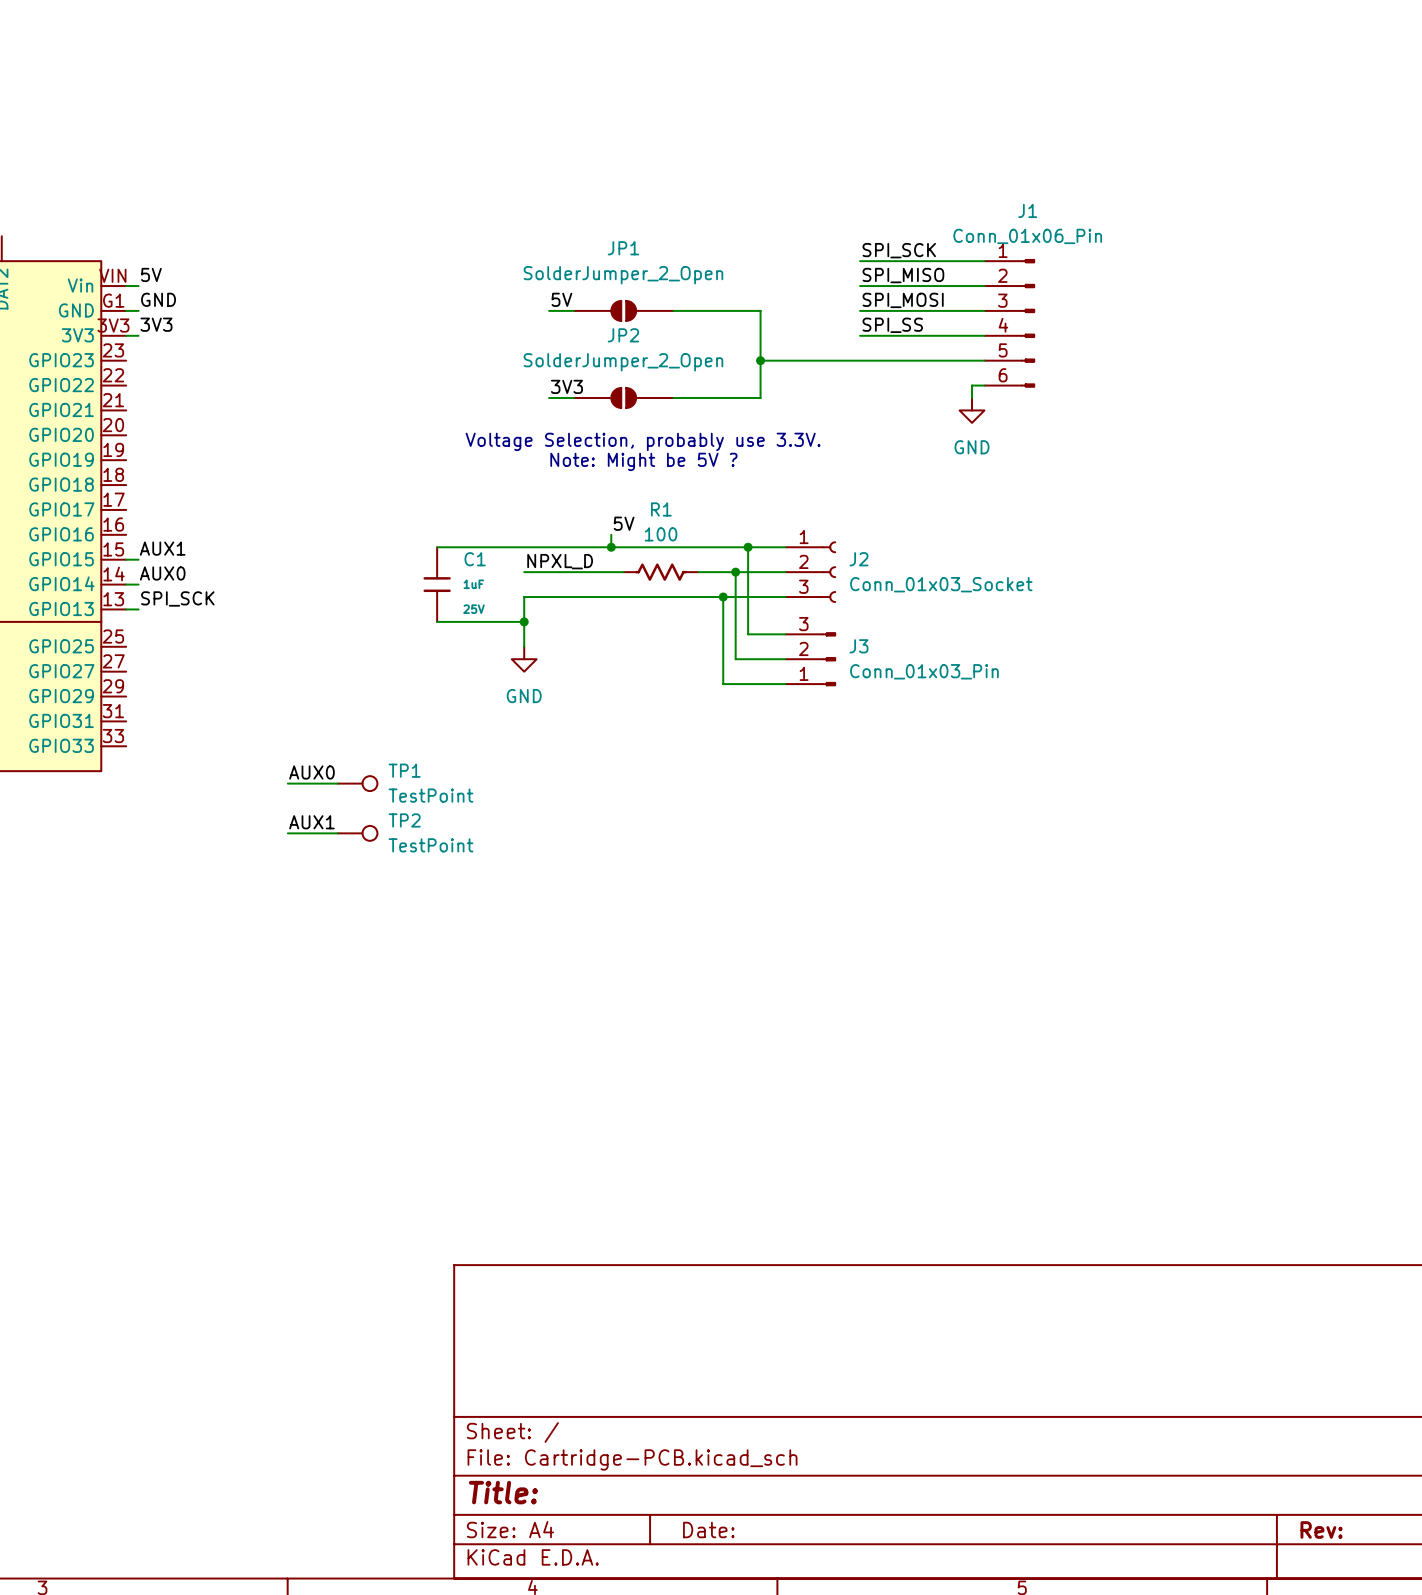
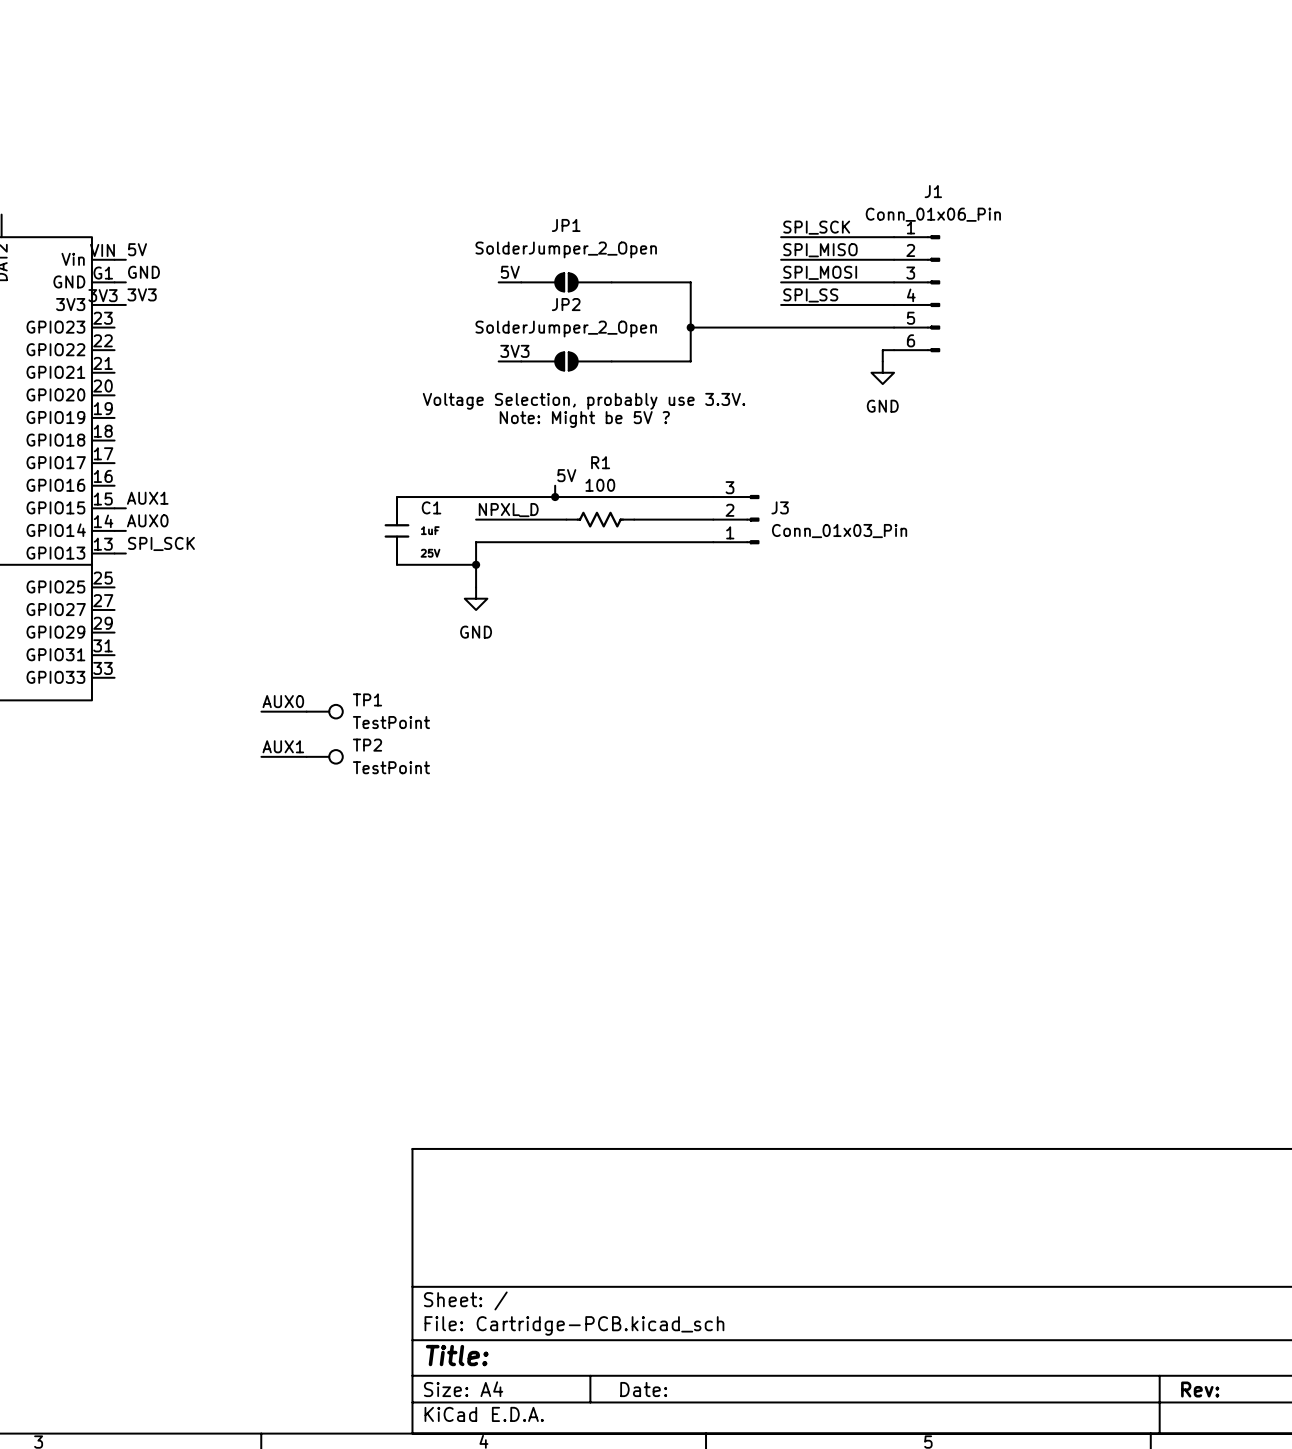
wire: (748, 547) (748, 634) (785, 634) -> none
junction: (748, 547) -> none
wire: (735, 572) (735, 659) (785, 659) -> none
junction: (735, 572) -> none
J2: Conn_01x03_Socket (810, 572) -> none
wire: (723, 597) (723, 684) (785, 684) -> none
junction: (723, 597) -> none
J3 position: (810, 659) -> (736, 519)

